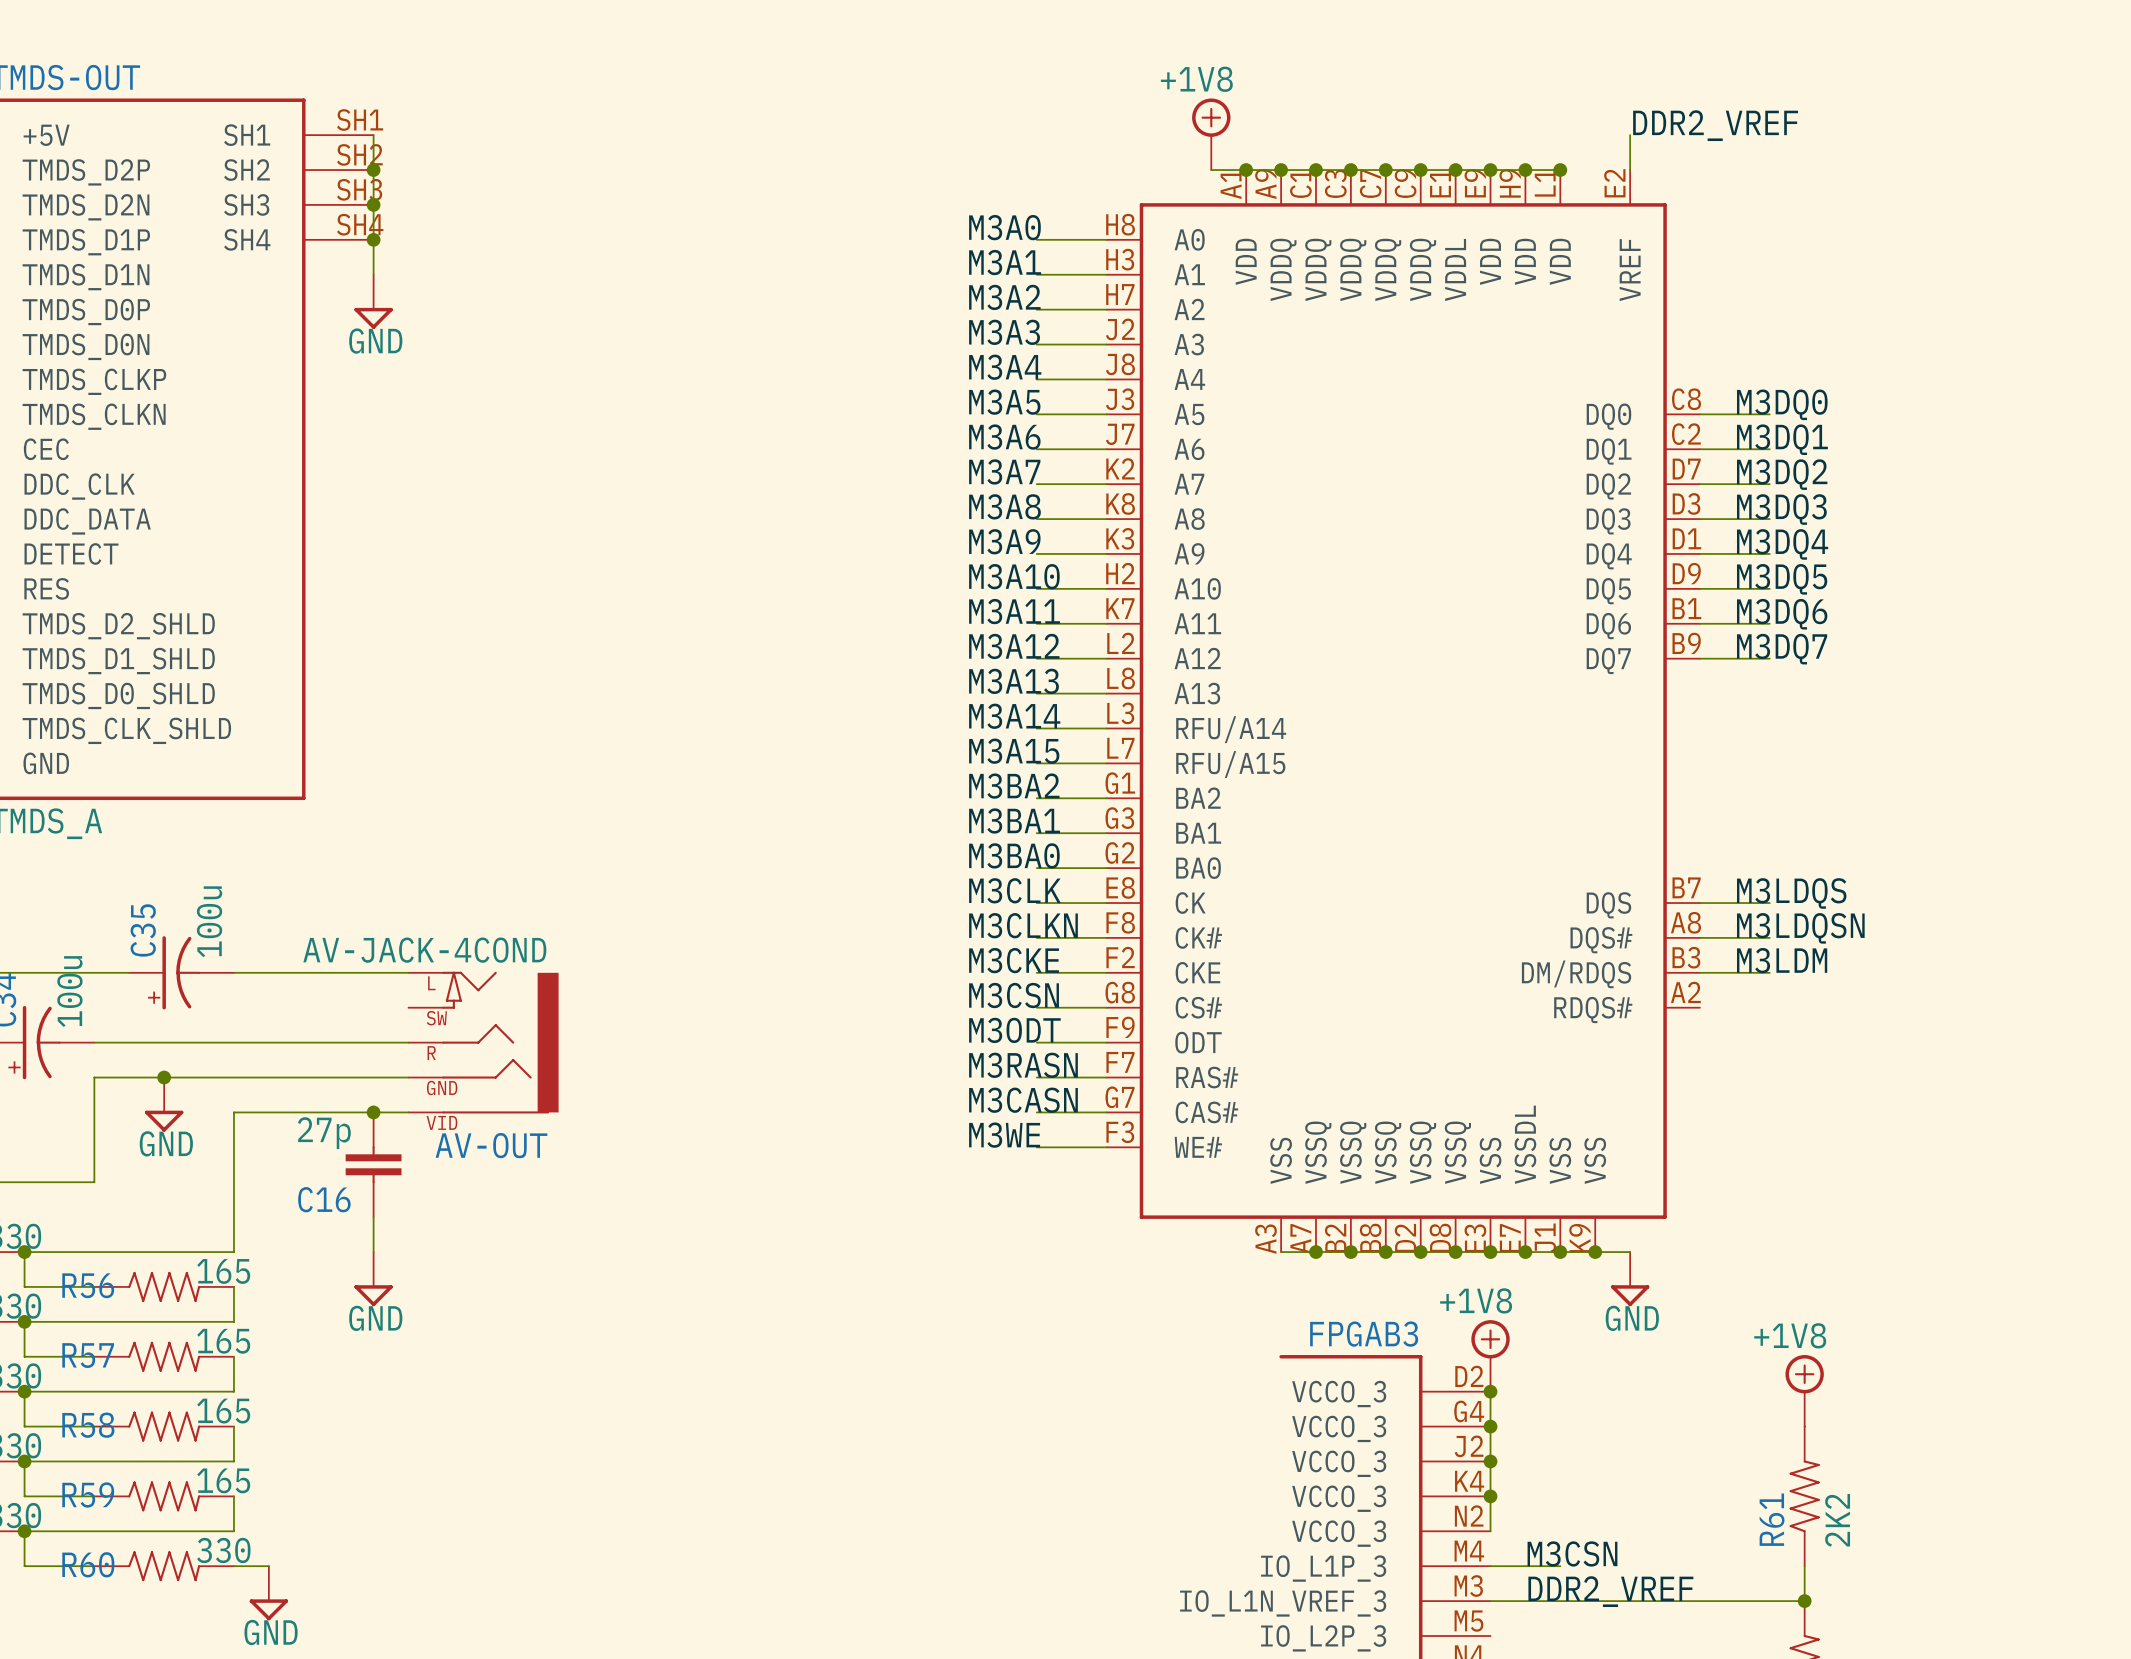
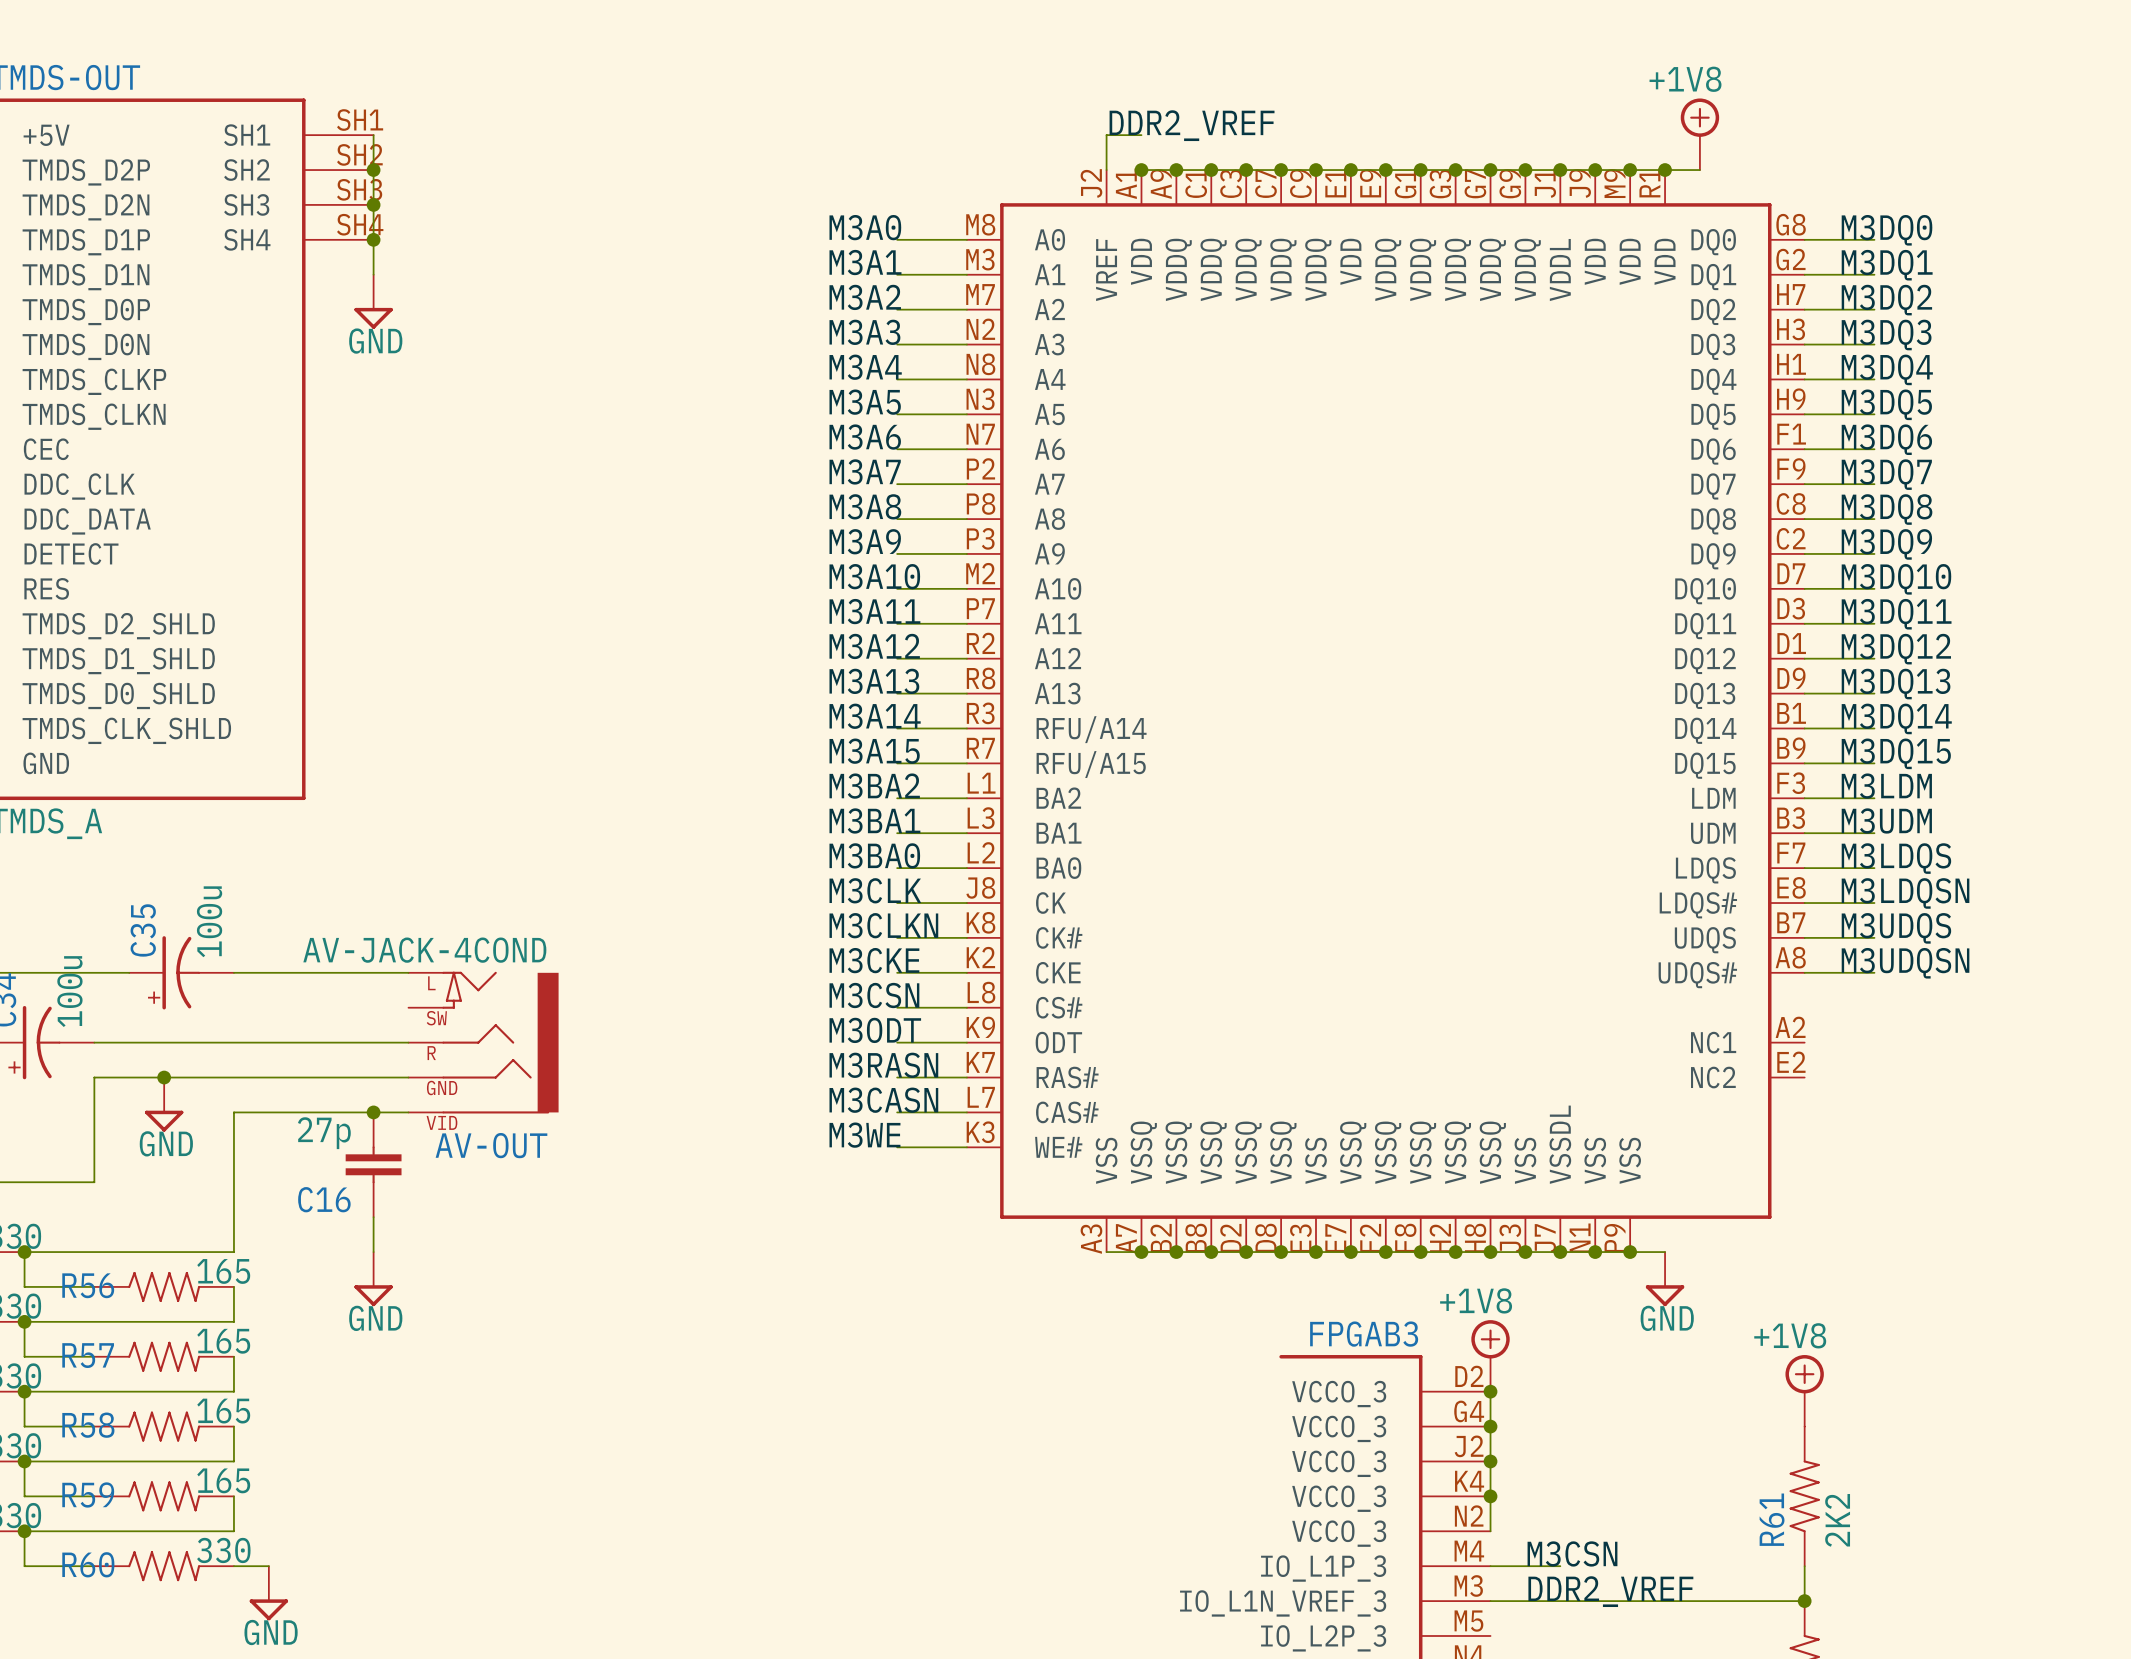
label: none -> DDR2_VREF (1192, 125)
label: DDR2_VREF (1715, 125) -> none
power symbol: +1V8 (1211, 134) -> none
power symbol: none -> +1V8 (1699, 134)
wire: none -> (1141, 135) (1106, 135) (1106, 170)
wire: (1630, 135) (1630, 170) -> none
wire: none -> (1141, 170) (1211, 170)
junction: none -> (1141, 170)
junction: none -> (1176, 170)
junction: none -> (1211, 170)
wire: none -> (1560, 170) (1699, 170)
junction: none -> (1595, 170)
junction: none -> (1630, 170)
junction: none -> (1665, 170)
label position: M3A0 (1004, 227) -> M3A0 (865, 227)
wire: (1036, 239) (1106, 239) -> (897, 239) (966, 239)
wire: none -> (1804, 239) (1874, 239)
label position: M3A1 (1005, 262) -> M3A1 (865, 262)
wire: (1036, 274) (1106, 274) -> (897, 274) (966, 274)
wire: none -> (1804, 274) (1874, 274)
label position: M3A2 (1004, 297) -> M3A2 (865, 297)
wire: (1036, 309) (1106, 309) -> (897, 309) (966, 309)
wire: none -> (1804, 309) (1874, 309)
label position: M3A3 (1004, 332) -> M3A3 (864, 332)
wire: (1036, 344) (1106, 344) -> (897, 344) (966, 344)
label position: M3A4 (1005, 367) -> M3A4 (865, 367)
wire: (1036, 379) (1106, 379) -> (897, 379) (966, 379)
label position: M3A5 (1004, 402) -> M3A5 (865, 402)
label position: M3DQ0 (1782, 404) -> M3DQ0 (1887, 230)
wire: (1036, 414) (1106, 414) -> (897, 414) (966, 414)
wire: (1699, 414) (1769, 414) -> (1804, 344) (1874, 344)
label position: M3A6 (1004, 437) -> M3A6 (865, 437)
label position: M3DQ1 (1782, 439) -> M3DQ1 (1887, 265)
wire: (1036, 449) (1106, 449) -> (897, 449) (966, 449)
wire: (1699, 449) (1769, 449) -> (1804, 379) (1874, 379)
label position: M3A7 (1004, 471) -> M3A7 (865, 471)
label position: M3DQ2 (1782, 474) -> M3DQ2 (1886, 300)
wire: (1036, 484) (1106, 484) -> (897, 484) (966, 484)
wire: (1699, 484) (1769, 484) -> (1804, 414) (1874, 414)
label position: M3A8 (1004, 506) -> M3A8 (865, 506)
label position: M3DQ3 (1781, 509) -> M3DQ3 (1886, 334)
label: none -> M3DQ8 (1887, 509)
wire: (1036, 519) (1106, 519) -> (897, 519) (966, 519)
wire: (1699, 519) (1769, 519) -> (1804, 449) (1874, 449)
label position: M3A9 (1004, 541) -> M3A9 (865, 541)
label position: M3DQ4 (1782, 544) -> M3DQ4 (1887, 369)
label: none -> M3DQ9 (1886, 544)
wire: (1036, 553) (1106, 553) -> (897, 553) (966, 553)
wire: (1699, 553) (1769, 553) -> (1804, 484) (1874, 484)
label position: M3A10 (1014, 576) -> M3A10 (874, 576)
label position: M3DQ5 (1782, 579) -> M3DQ5 (1886, 404)
label: none -> M3DQ10 (1896, 579)
wire: (1036, 588) (1106, 588) -> (897, 588) (966, 588)
wire: (1699, 588) (1769, 588) -> (1804, 519) (1874, 519)
label position: M3A11 (1014, 611) -> M3A11 (874, 611)
label position: M3DQ6 (1782, 614) -> M3DQ6 (1886, 439)
label: none -> M3DQ11 (1896, 614)
wire: (1036, 623) (1106, 623) -> (897, 623) (966, 623)
wire: (1699, 623) (1769, 623) -> (1804, 553) (1874, 553)
wire: none -> (1804, 623) (1874, 623)
label position: M3A12 (1014, 646) -> M3A12 (874, 646)
label position: M3DQ7 (1782, 649) -> M3DQ7 (1886, 474)
label: none -> M3DQ12 (1896, 649)
wire: (1036, 658) (1106, 658) -> (897, 658) (966, 658)
wire: (1699, 658) (1769, 658) -> (1804, 588) (1874, 588)
wire: none -> (1804, 658) (1874, 658)
label position: M3A13 (1014, 681) -> M3A13 (874, 681)
label: none -> M3DQ13 (1896, 684)
wire: (1036, 693) (1106, 693) -> (897, 693) (966, 693)
wire: none -> (1804, 693) (1874, 693)
part: none -> (1385, 711)
part: (1403, 711) -> none
label position: M3A14 (1014, 716) -> M3A14 (875, 716)
label: none -> M3DQ14 (1896, 718)
wire: (1036, 728) (1106, 728) -> (897, 728) (966, 728)
wire: none -> (1804, 728) (1874, 728)
label position: M3A15 (1014, 751) -> M3A15 (874, 751)
label: none -> M3DQ15 (1896, 753)
wire: (1036, 763) (1106, 763) -> (897, 763) (966, 763)
wire: none -> (1804, 763) (1874, 763)
label position: M3BA2 (1014, 786) -> M3BA2 (874, 786)
wire: (1036, 798) (1106, 798) -> (897, 798) (966, 798)
wire: none -> (1804, 798) (1874, 798)
label position: M3BA1 (1014, 820) -> M3BA1 (874, 820)
label: none -> M3UDM (1886, 820)
wire: (1036, 833) (1106, 833) -> (897, 833) (966, 833)
label position: M3BA0 (1014, 855) -> M3BA0 (874, 855)
wire: (1036, 868) (1106, 868) -> (897, 868) (966, 868)
label position: M3CLK (1014, 890) -> M3CLK (875, 890)
label position: M3LDQS (1791, 893) -> M3LDQS (1896, 858)
wire: (1036, 903) (1106, 903) -> (897, 903) (966, 903)
wire: (1699, 903) (1769, 903) -> (1804, 833) (1874, 833)
label position: M3CLKN (1023, 925) -> M3CLKN (883, 925)
label position: M3LDQSN (1800, 928) -> M3LDQSN (1905, 893)
label: none -> M3UDQS (1896, 928)
wire: (1036, 937) (1106, 937) -> (897, 937) (966, 937)
wire: (1699, 937) (1769, 937) -> (1804, 868) (1874, 868)
wire: none -> (1804, 937) (1874, 937)
label position: M3CKE (1014, 960) -> M3CKE (874, 960)
label position: M3LDM (1782, 960) -> M3LDM (1886, 786)
label: none -> M3UDQSN (1905, 963)
wire: (1036, 972) (1106, 972) -> (897, 972) (966, 972)
wire: (1699, 972) (1769, 972) -> (1804, 903) (1874, 903)
wire: none -> (1804, 972) (1874, 972)
label position: M3CSN (1014, 995) -> M3CSN (874, 995)
wire: (1036, 1007) (1106, 1007) -> (897, 1007) (966, 1007)
label position: M3ODT (1014, 1030) -> M3ODT (875, 1030)
wire: (1036, 1042) (1106, 1042) -> (897, 1042) (966, 1042)
label position: M3RASN (1023, 1065) -> M3RASN (883, 1065)
wire: (1036, 1077) (1106, 1077) -> (897, 1077) (966, 1077)
label position: M3CASN (1023, 1100) -> M3CASN (883, 1100)
wire: (1036, 1112) (1106, 1112) -> (897, 1112) (966, 1112)
label position: M3WE (1004, 1135) -> M3WE (864, 1135)
wire: (1036, 1147) (1106, 1147) -> (897, 1147) (966, 1147)
wire: none -> (1106, 1252) (1281, 1252)
junction: none -> (1141, 1252)
junction: none -> (1176, 1252)
junction: none -> (1211, 1252)
junction: none -> (1246, 1252)
junction: none -> (1281, 1252)
wire: none -> (1630, 1252) (1665, 1252)
junction: none -> (1630, 1252)
power symbol position: GND (1630, 1279) -> GND (1665, 1279)

